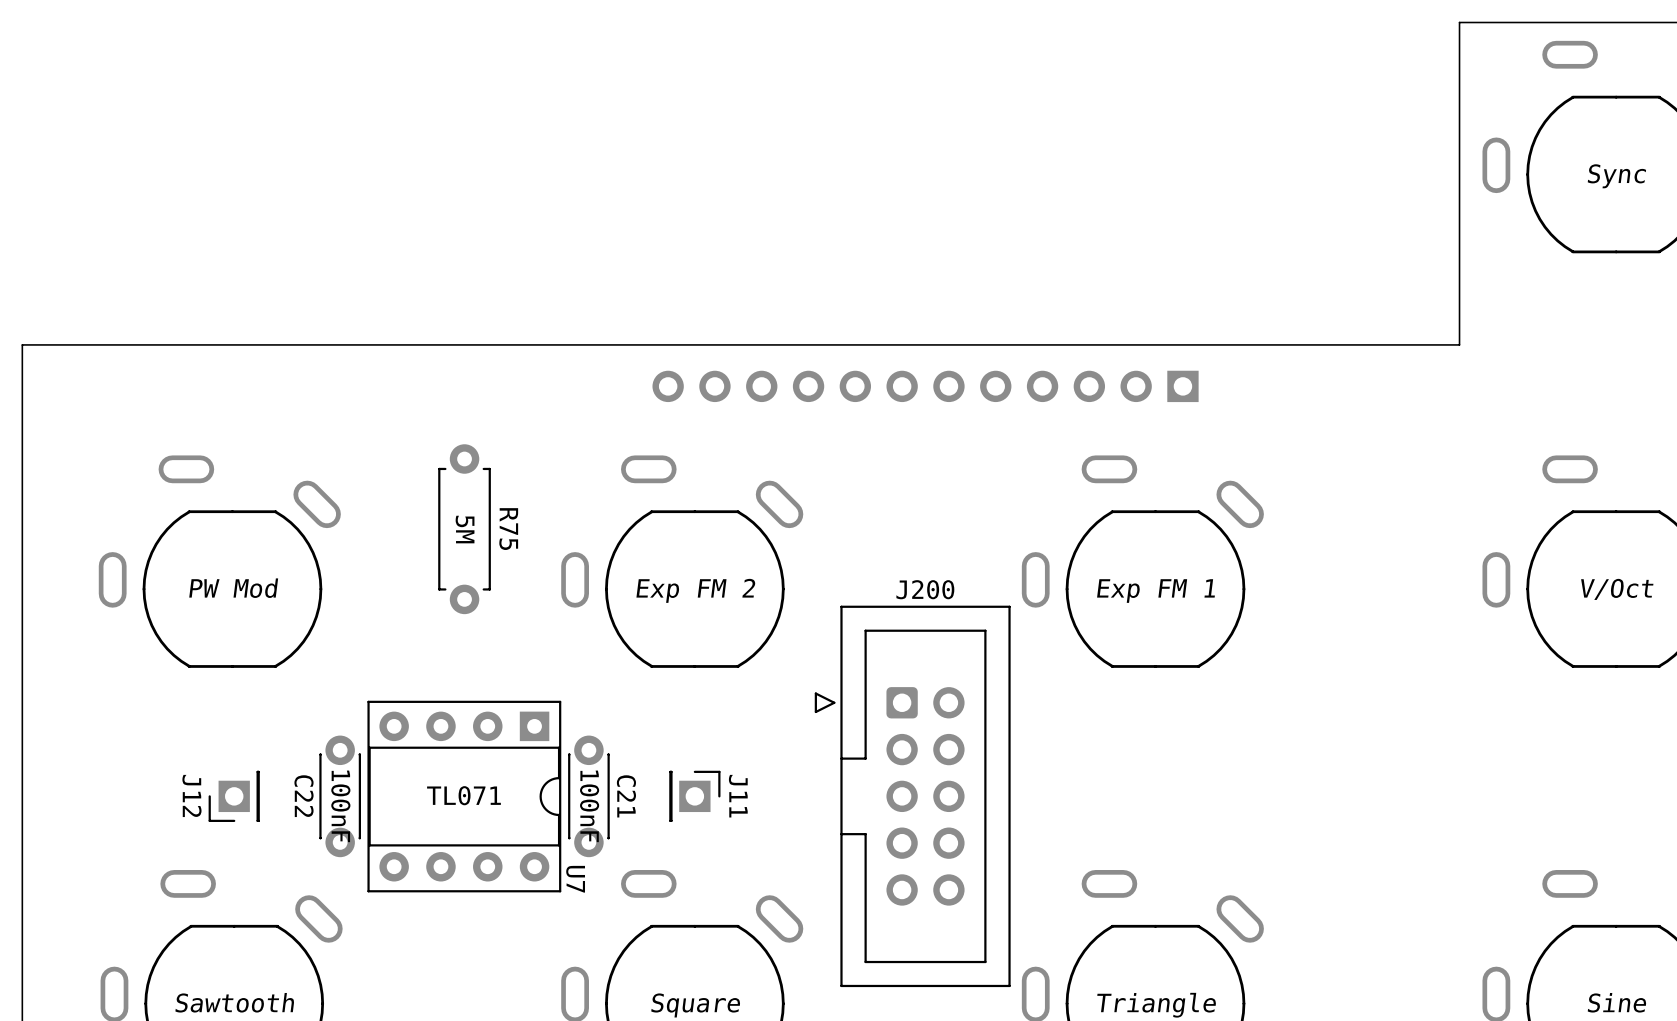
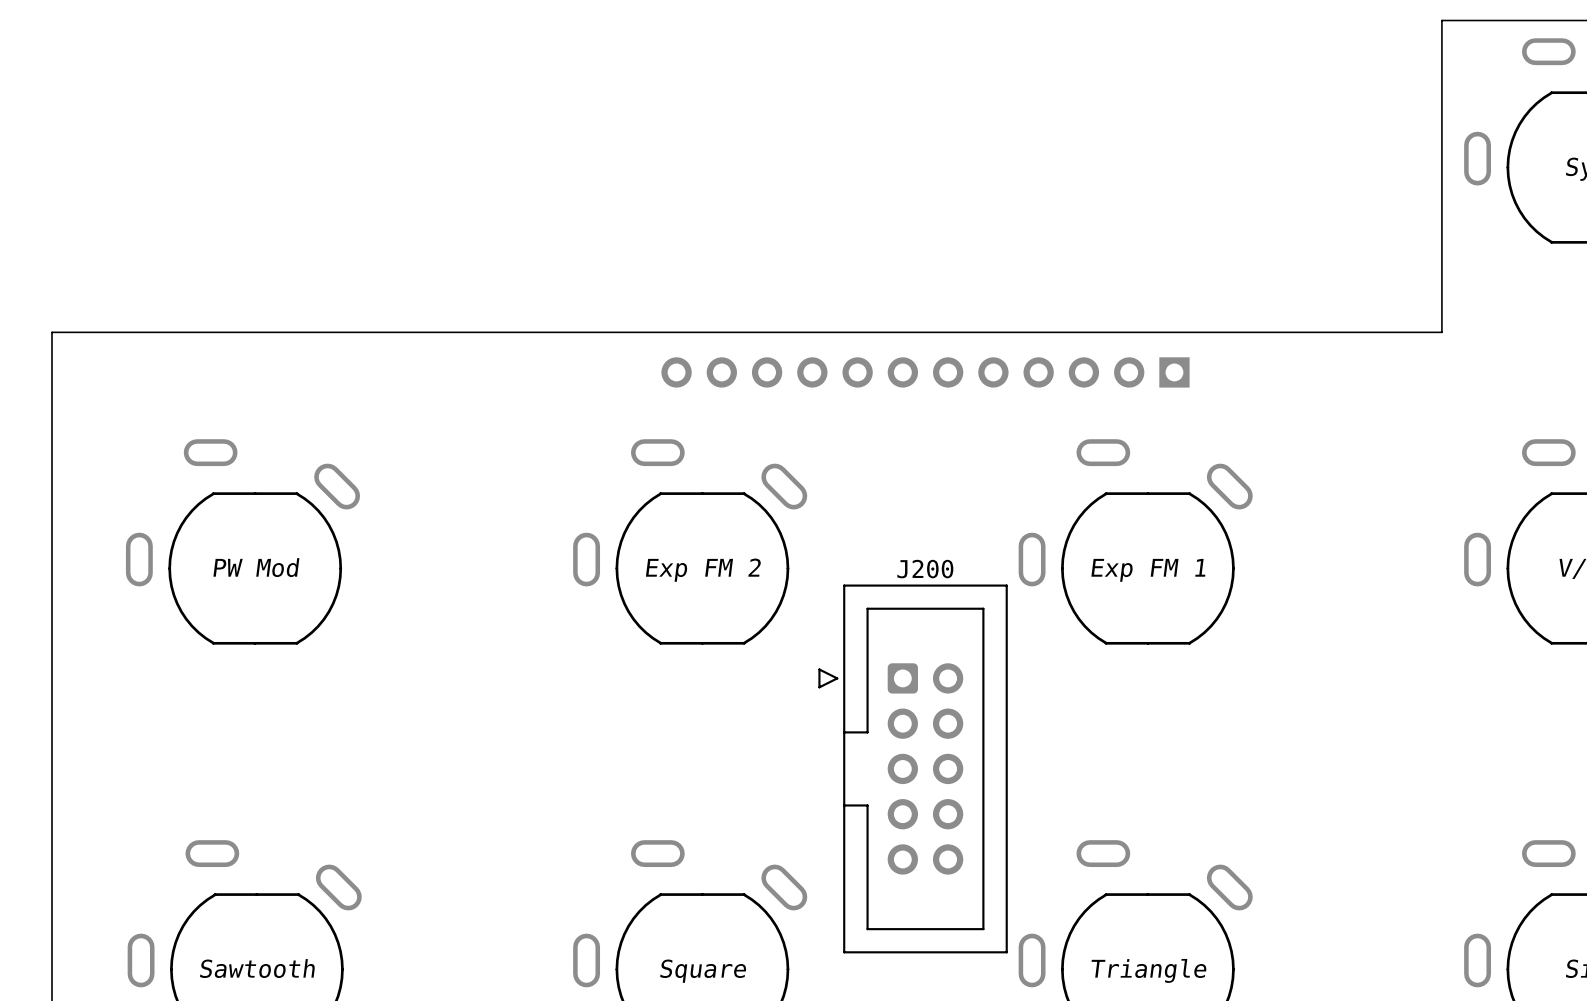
R75: 5M (464, 529) -> none
J12: (234, 796) -> none
C22: 100nF (340, 796) -> none
U7: TL071 (464, 796) -> none
C21: 100nF (588, 796) -> none
J11: (694, 796) -> none

